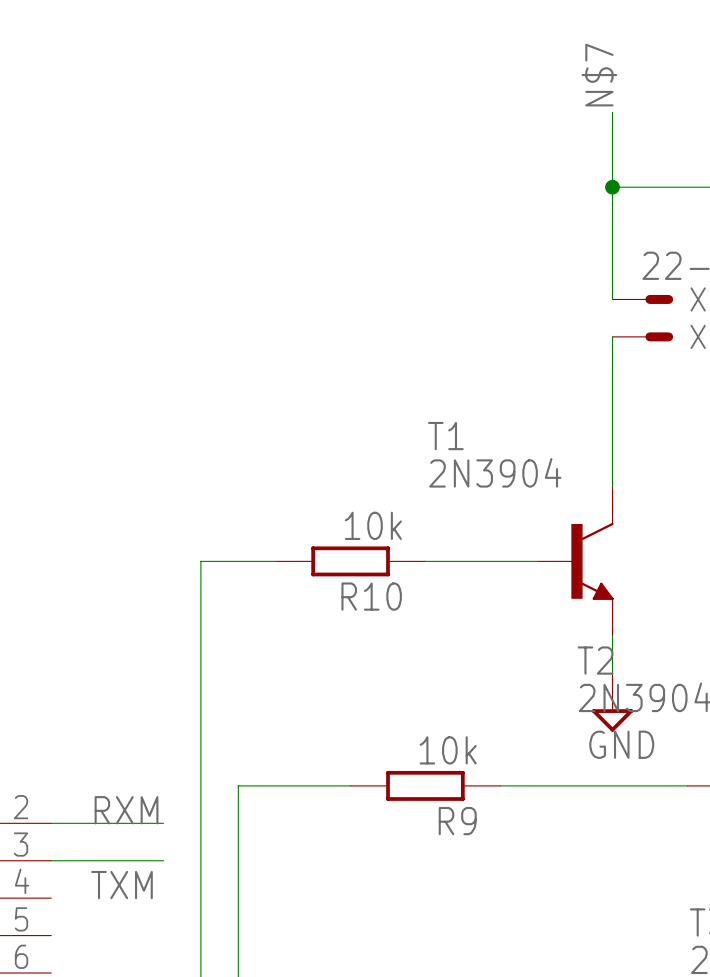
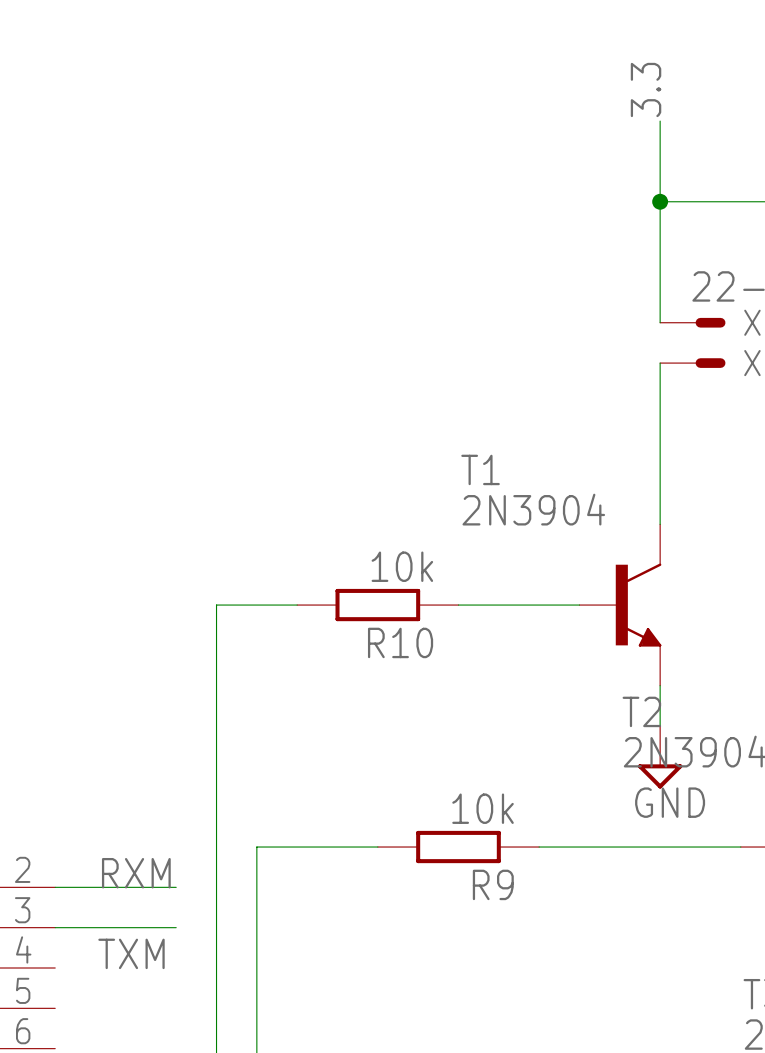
label: N$7 (599, 75) -> 3.3 (646, 89)

